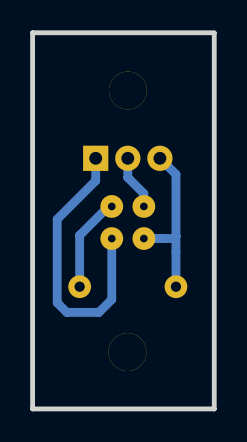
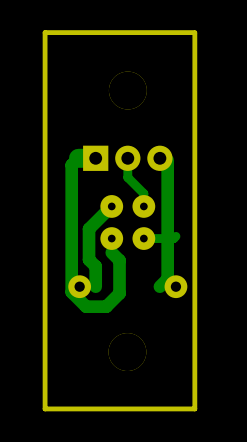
board edge: (214, 32) (32, 32) (32, 408) (45, 408) -> (194, 32) (45, 32) (45, 408)
board edge: (214, 33) (214, 408) (194, 408) -> (194, 33) (194, 408)
track: (95, 158) (95, 180) (57, 219) (57, 302) (66, 312) (98, 312) (111, 299) (111, 252) -> (95, 158) (78, 158) (71, 165) (71, 292) (86, 306) (106, 306) (119, 293) (119, 260) (111, 252)
track: (159, 158) (175, 174) (175, 286) -> none
track: none -> (167, 160) (167, 278) (159, 286)
track: (111, 206) (108, 206) (79, 235) (79, 286) -> (111, 206) (89, 228) (89, 259) (95, 266) (95, 286)

